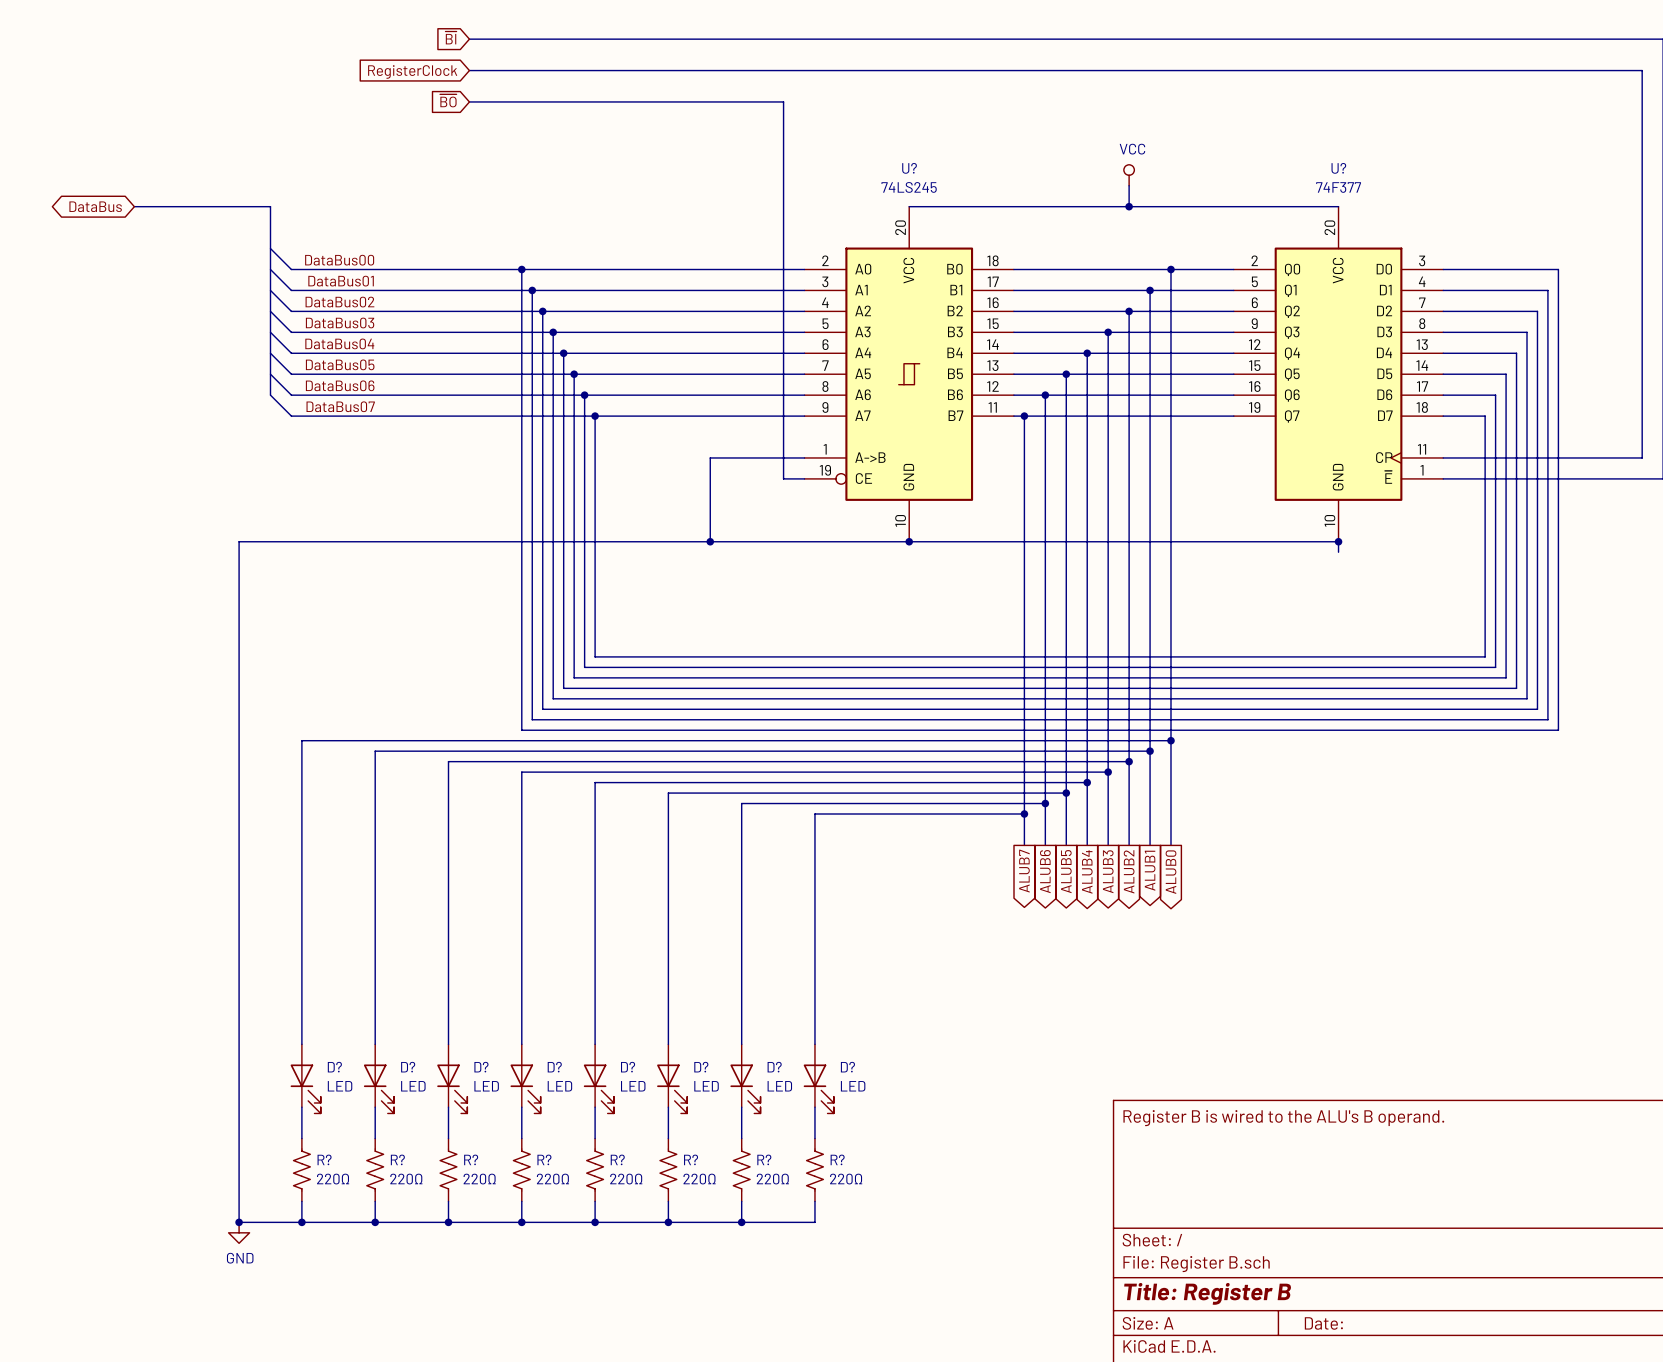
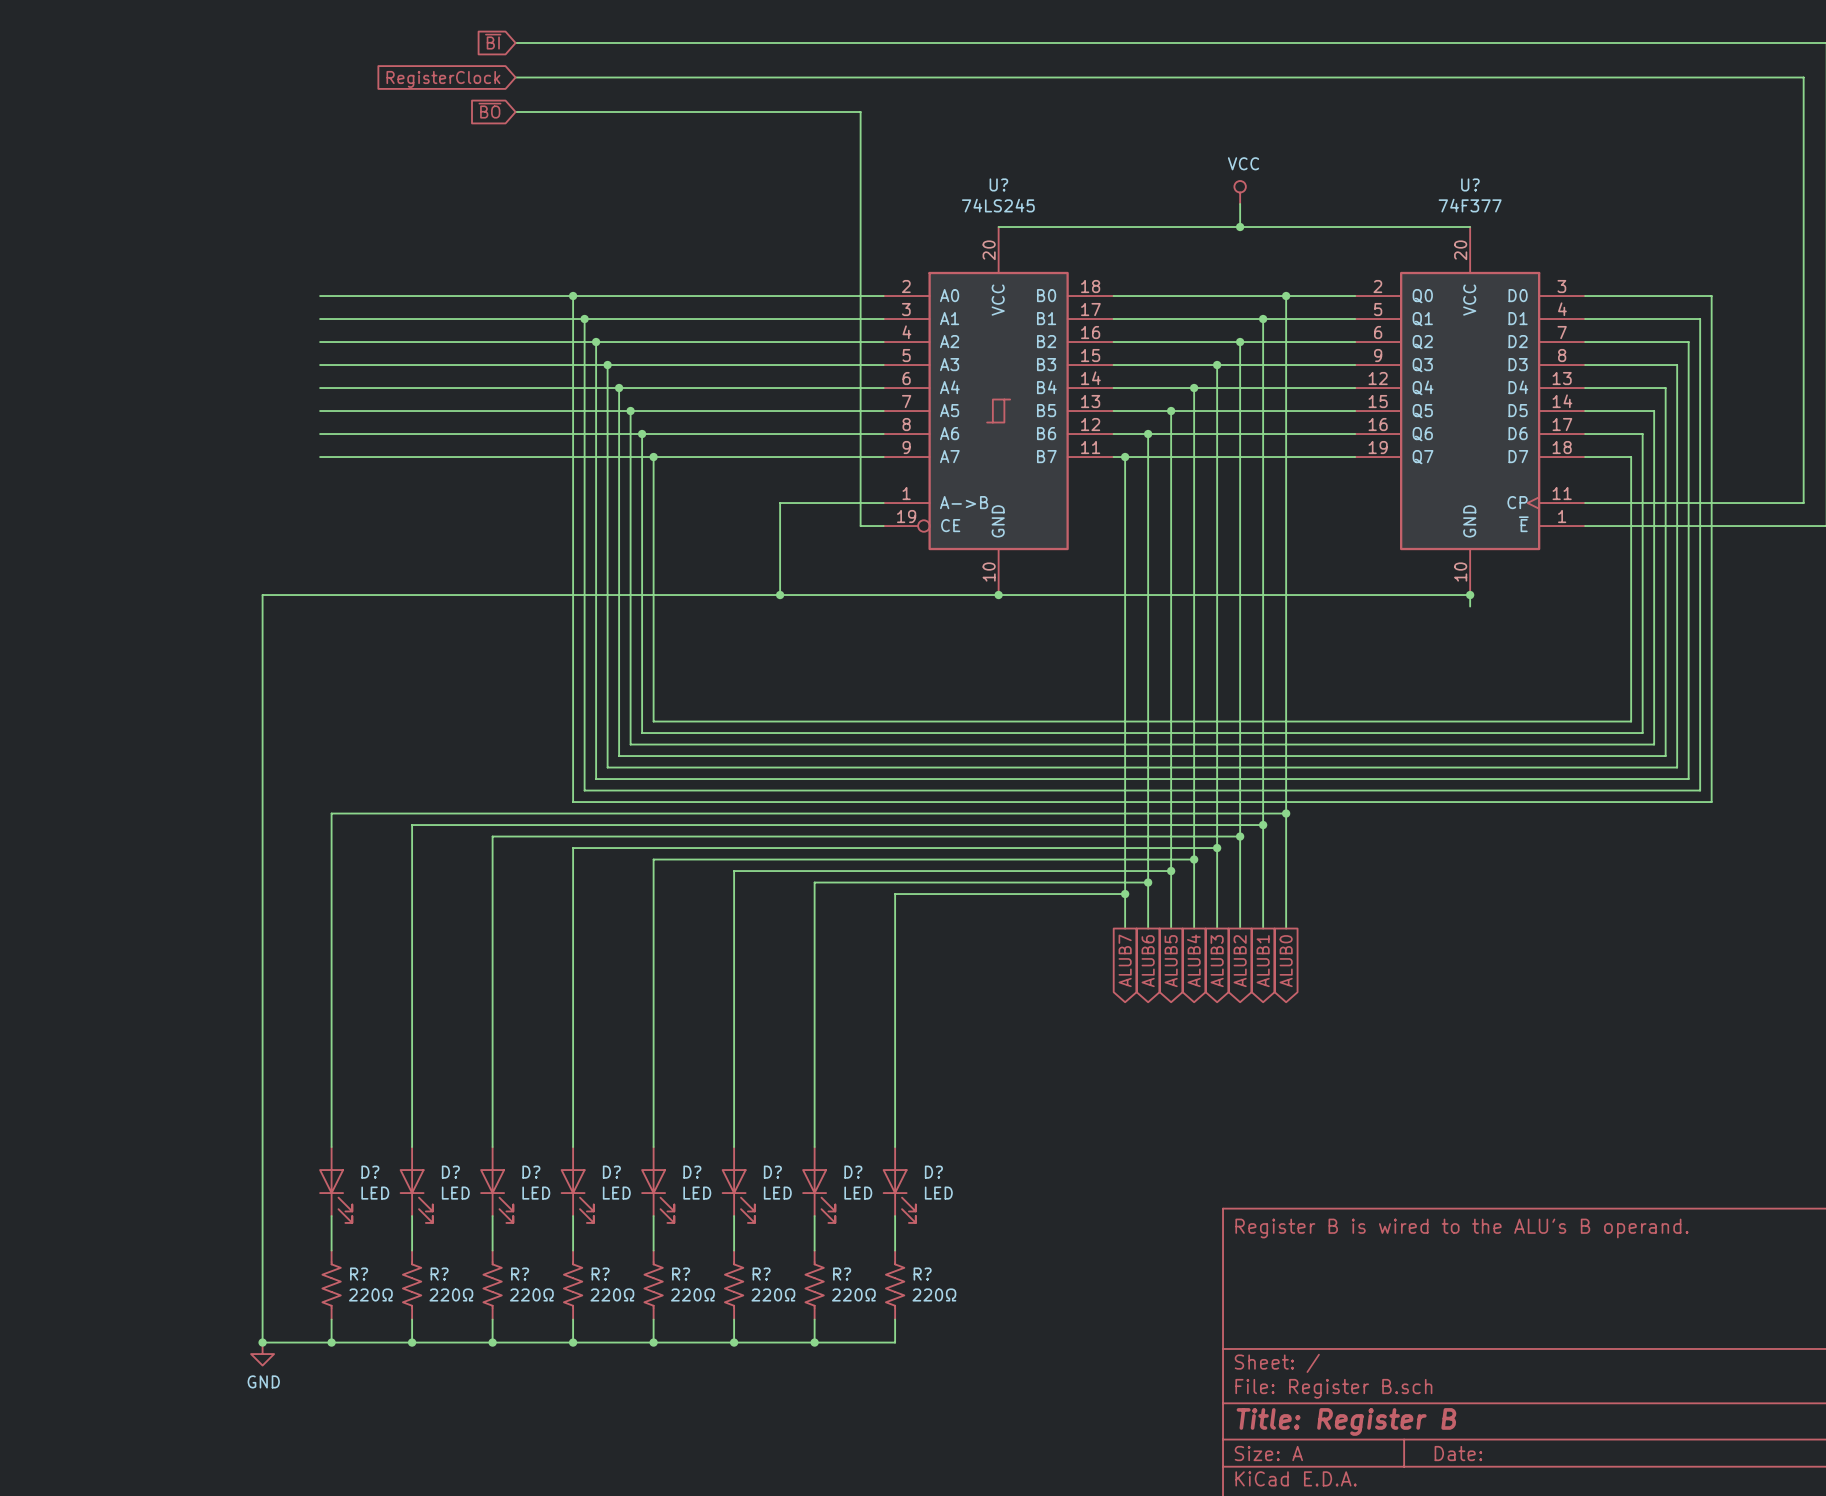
global label: DataBus (95, 206) -> none
bus: (134, 206) (270, 206) (270, 395) -> none
wire: (270, 248) (291, 269) -> none
label: DataBus00 (339, 260) -> none
wire: (270, 269) (291, 290) -> none
label: DataBus01 (341, 281) -> none
wire: (270, 290) (291, 311) -> none
label: DataBus02 (339, 302) -> none
wire: (270, 311) (291, 332) -> none
label: DataBus03 (340, 322) -> none
wire: (270, 332) (291, 353) -> none
label: DataBus04 (339, 343) -> none
wire: (270, 353) (291, 374) -> none
label: DataBus05 (340, 364) -> none
wire: (270, 374) (291, 395) -> none
label: DataBus06 (340, 385) -> none
wire: (270, 395) (291, 416) -> none
label: DataBus07 (340, 406) -> none

